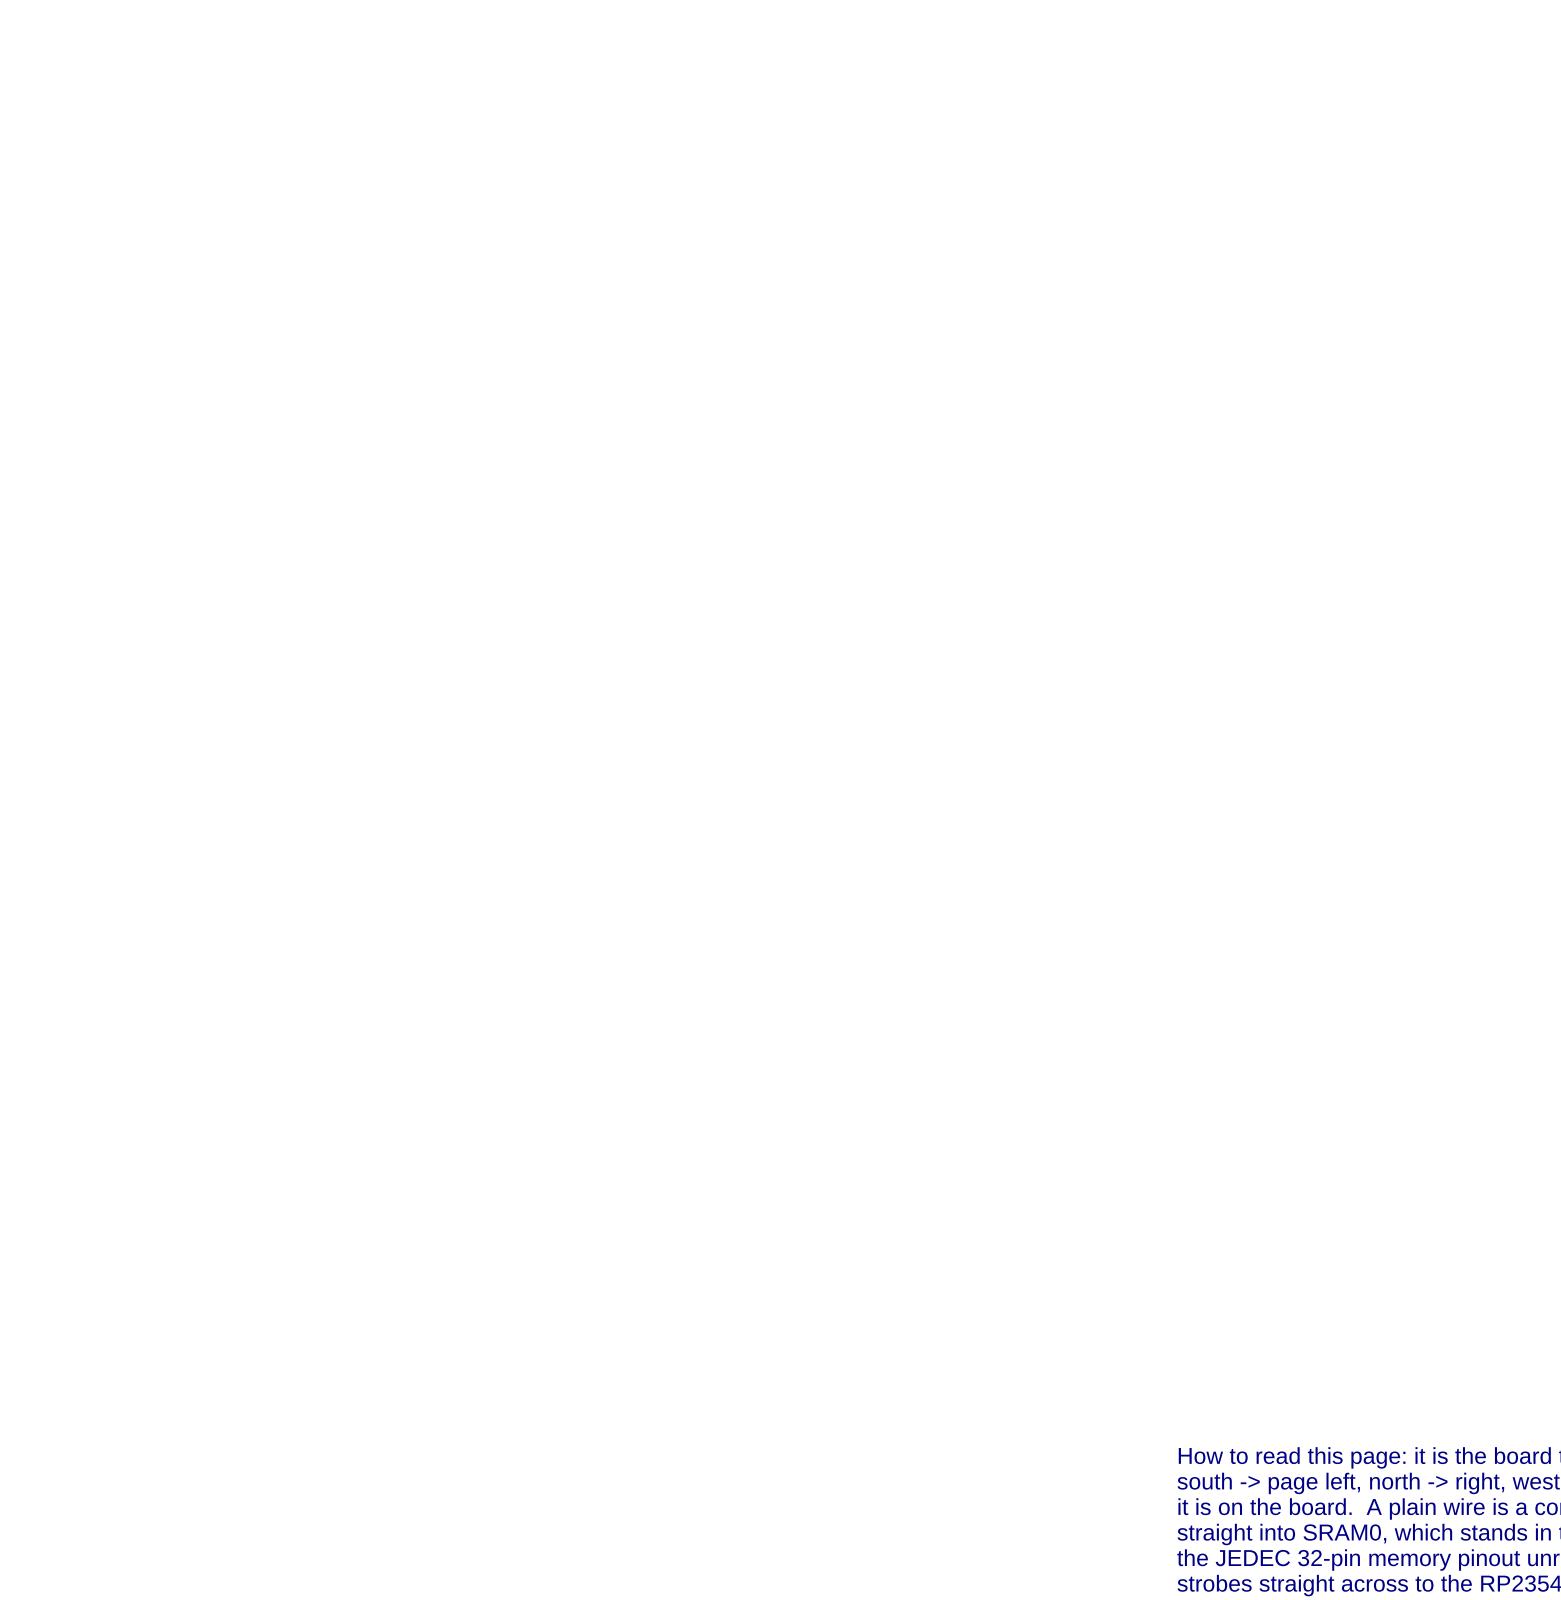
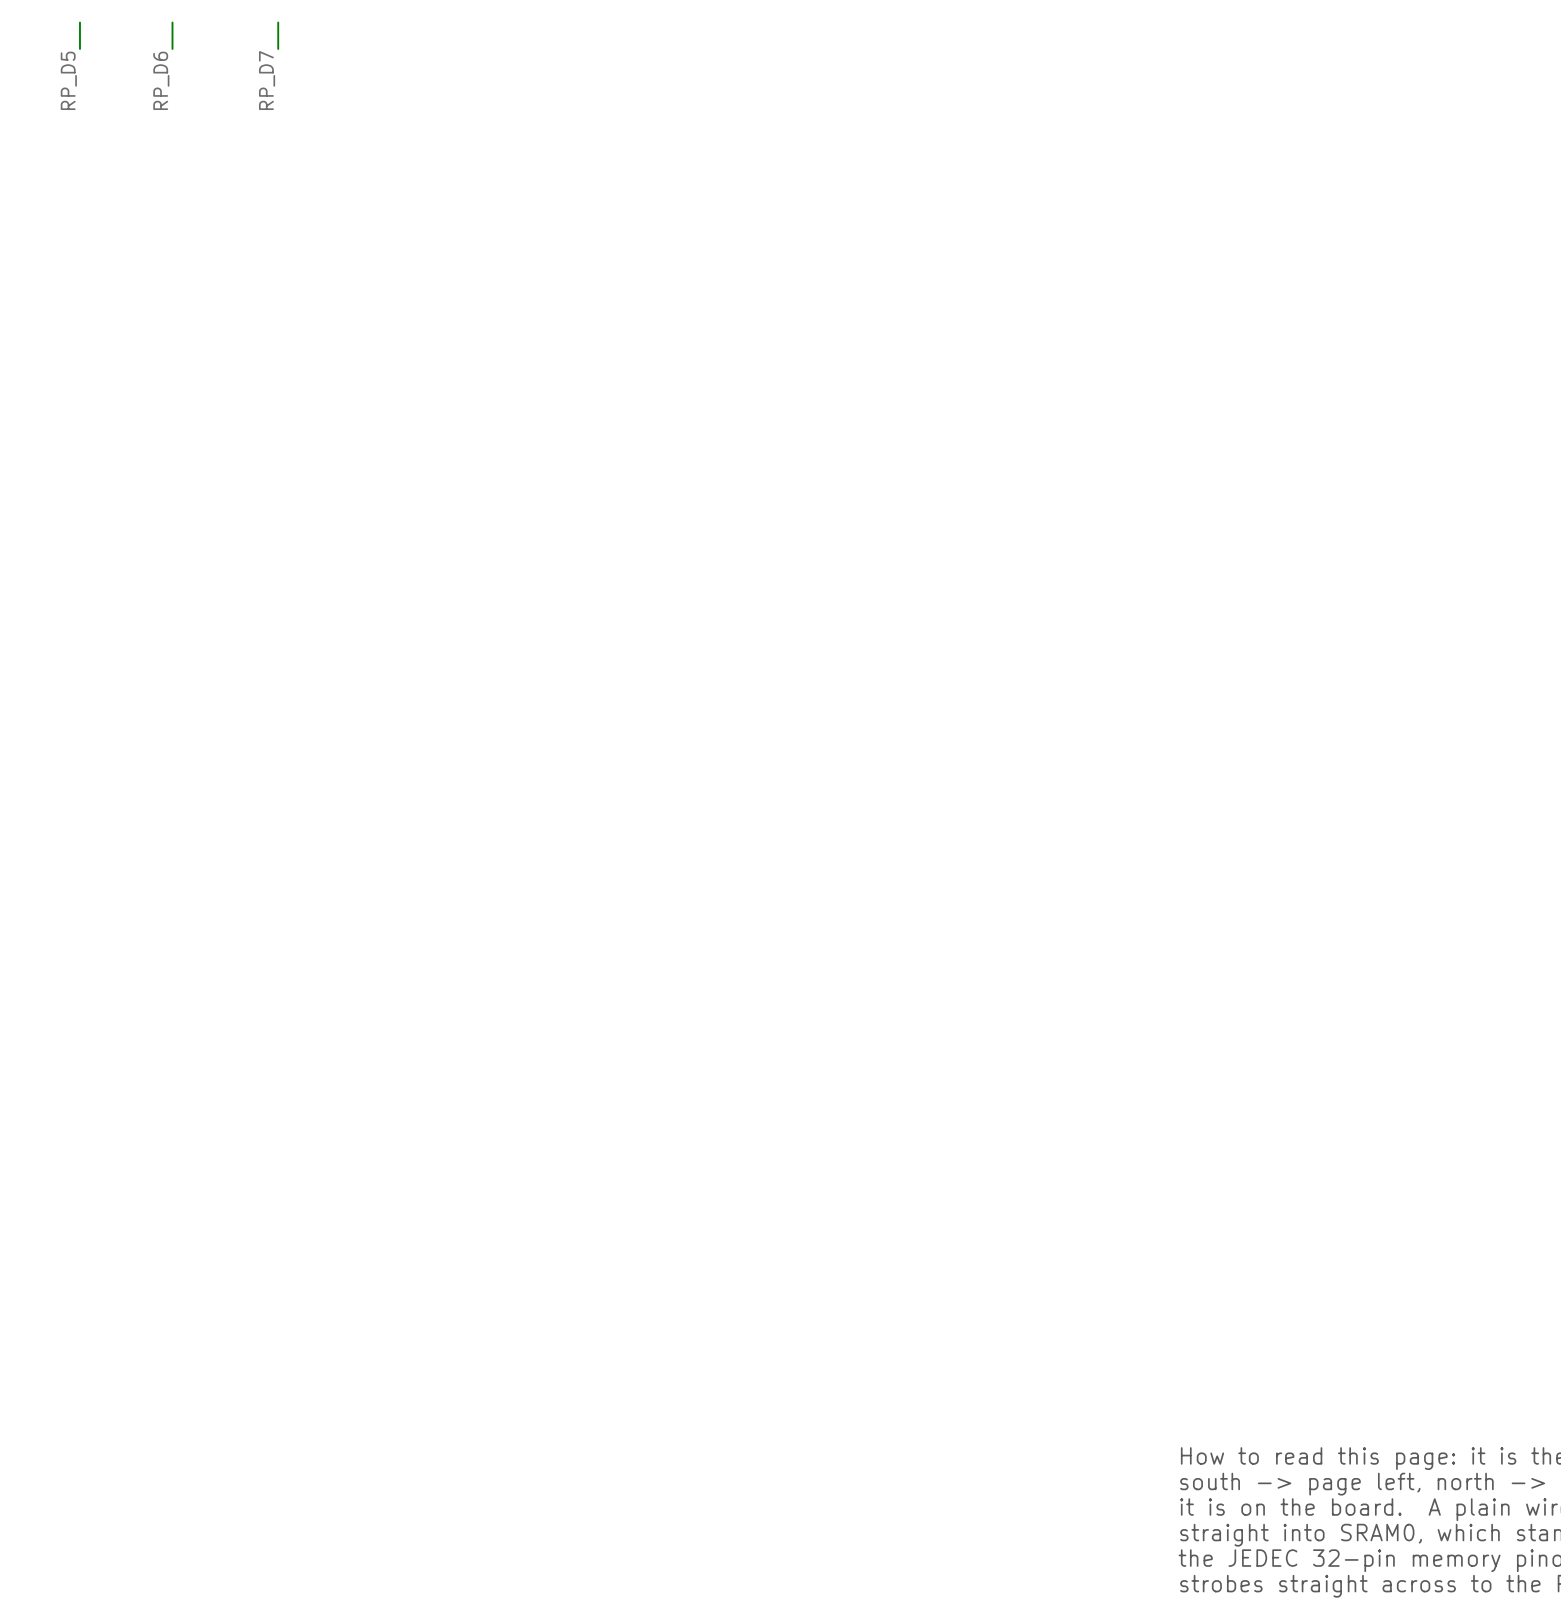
wire: none -> (79, 22) (79, 48)
wire: none -> (172, 22) (172, 48)
wire: none -> (278, 22) (278, 48)
label: none -> RP_D5 (68, 80)
label: none -> RP_D6 (161, 80)
label: none -> RP_D7 (267, 80)

